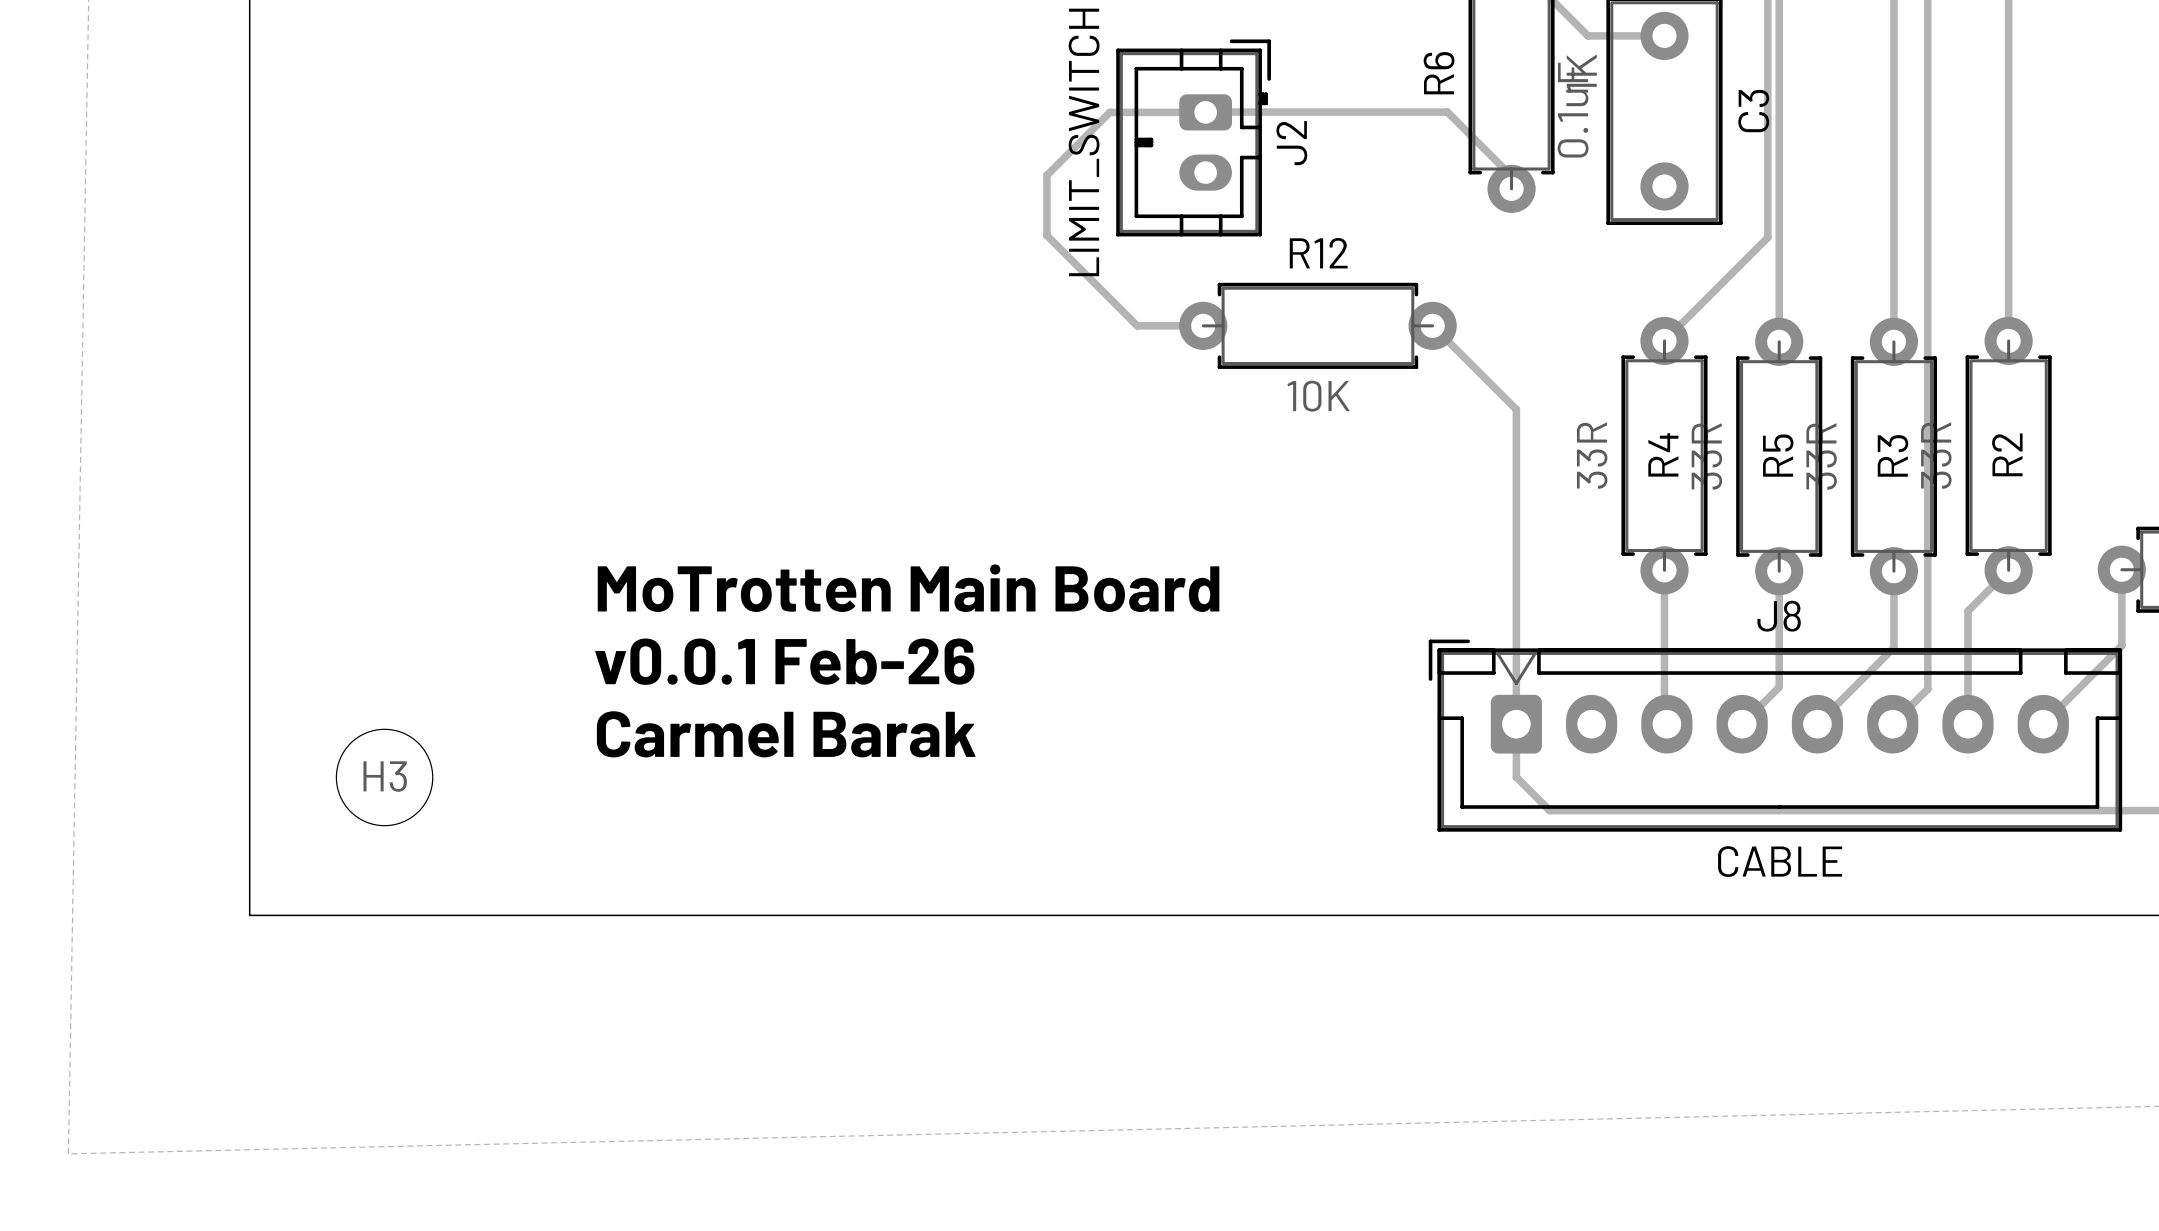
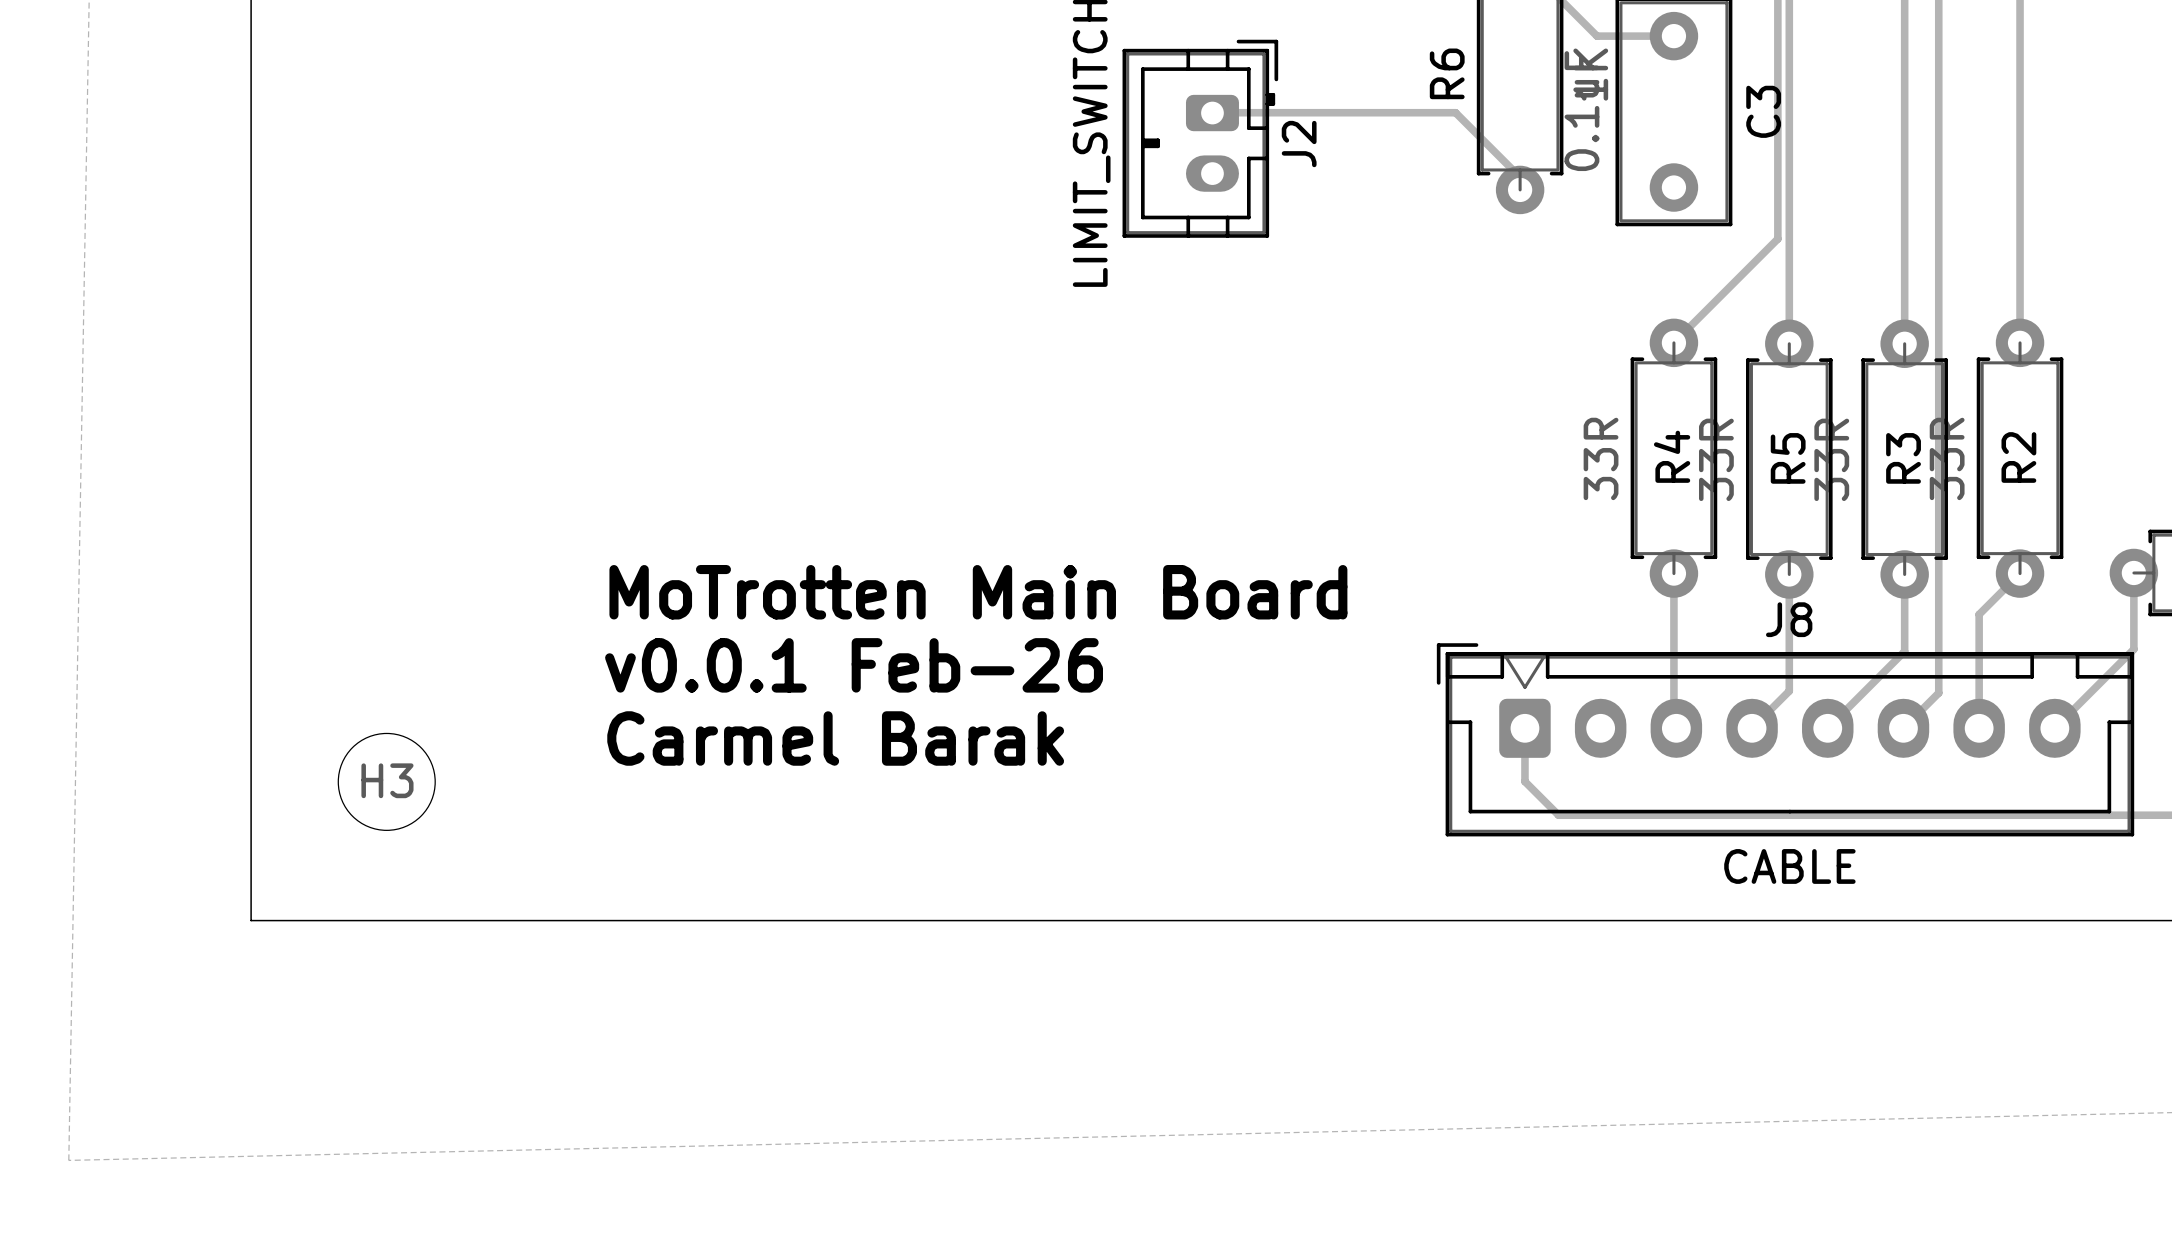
track: (1200, 112) (1109, 112) (1046, 175) (1046, 235) (1137, 325) (1203, 325) -> none
R12: 10K (1317, 325) -> none
track: (1432, 325) (1516, 409) (1516, 724) -> none

